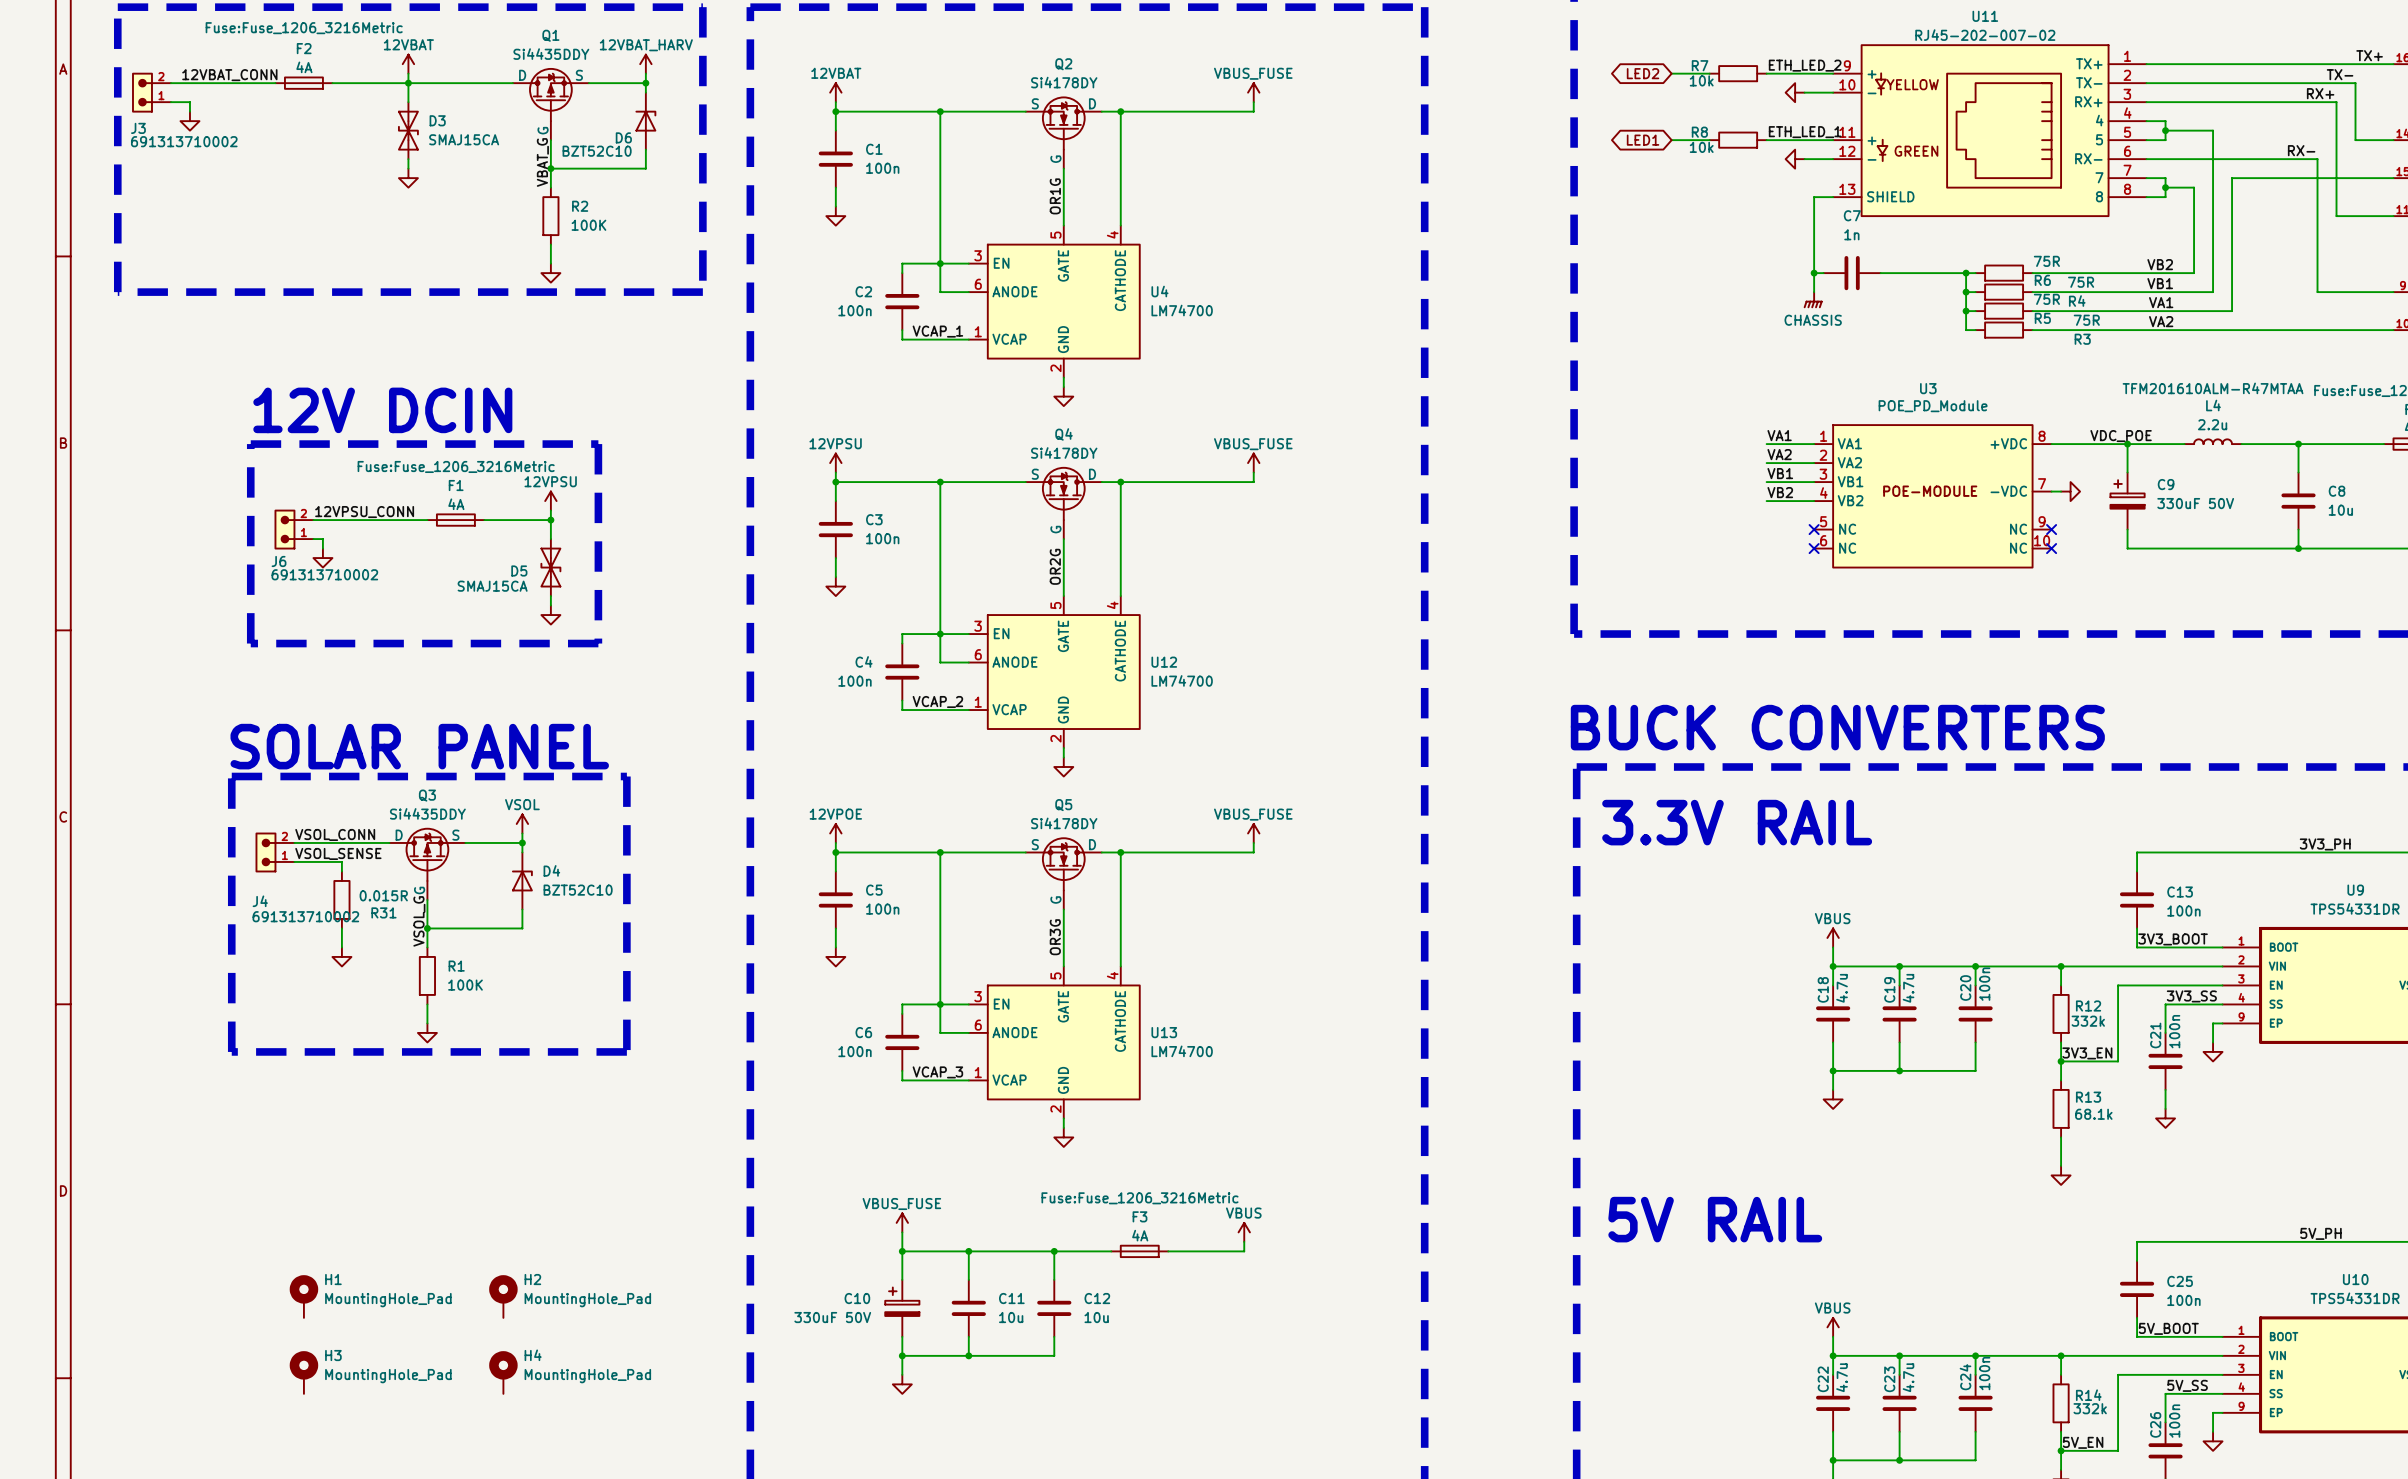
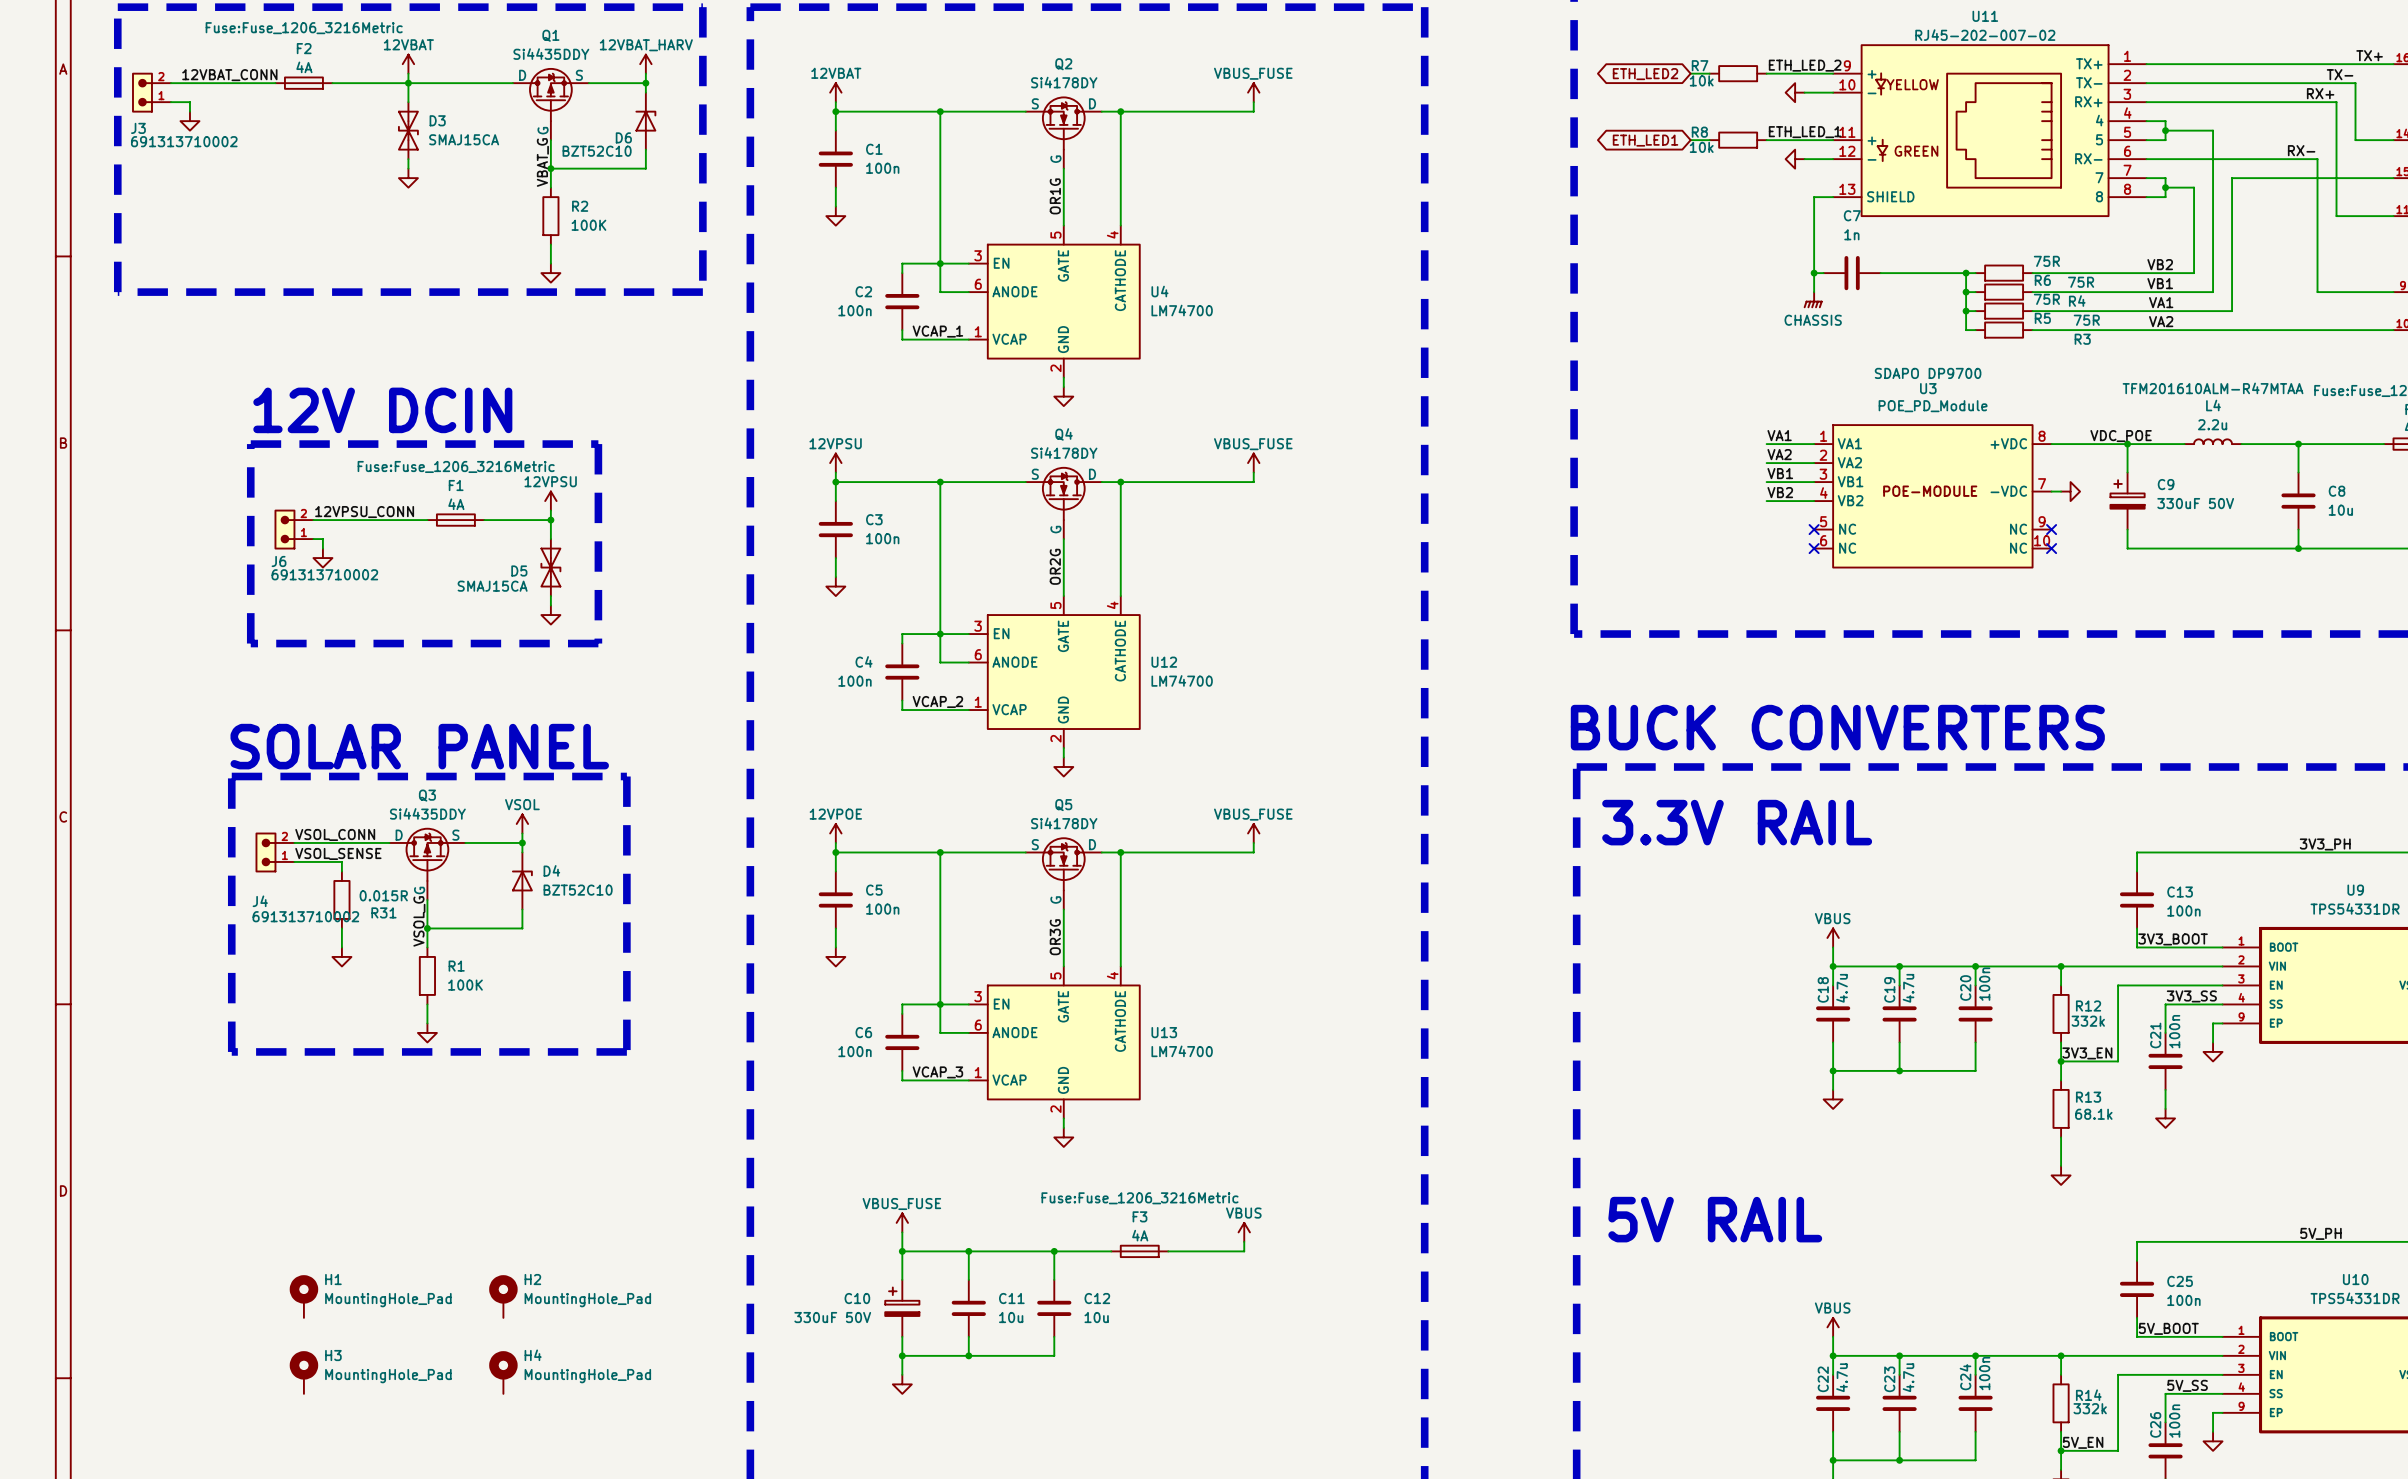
global label: LED2 (1643, 73) -> ETH_LED2 (1645, 74)
wire: (1671, 73) (1690, 73) -> none
global label: LED1 (1643, 140) -> ETH_LED1 (1645, 140)
wire: (1671, 140) (1690, 140) -> none
U3 text: none -> SDAPO DP9700 (1928, 373)

